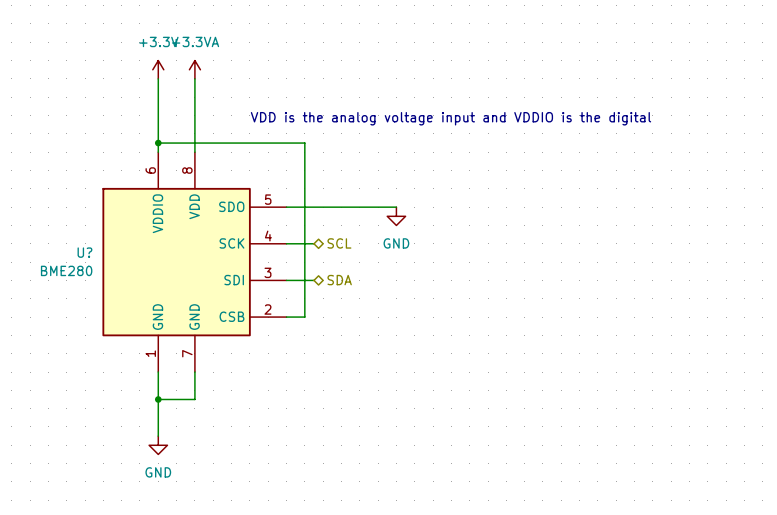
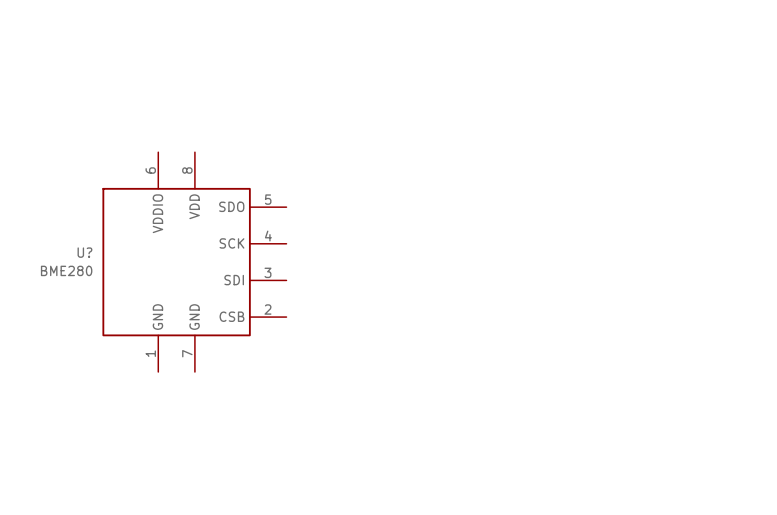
power symbol: +3.3V (158, 69) -> none
power symbol: +3.3VA (194, 69) -> none
wire: (158, 78) (158, 152) -> none
wire: (194, 78) (194, 152) -> none
text: VDD is the analog voltage input and VDDIO is the digital (451, 118) -> none
wire: (158, 143) (304, 143) (304, 317) (286, 317) -> none
junction: (158, 143) -> none
wire: (286, 207) (396, 207) -> none
power symbol: GND (396, 216) -> none
wire: (286, 243) (313, 243) -> none
hierarchical label: SCL (339, 243) -> none
wire: (286, 280) (313, 280) -> none
hierarchical label: SDA (339, 280) -> none
wire: (158, 372) (158, 436) -> none
wire: (194, 372) (194, 399) (158, 399) -> none
junction: (158, 399) -> none
power symbol: GND (158, 445) -> none

